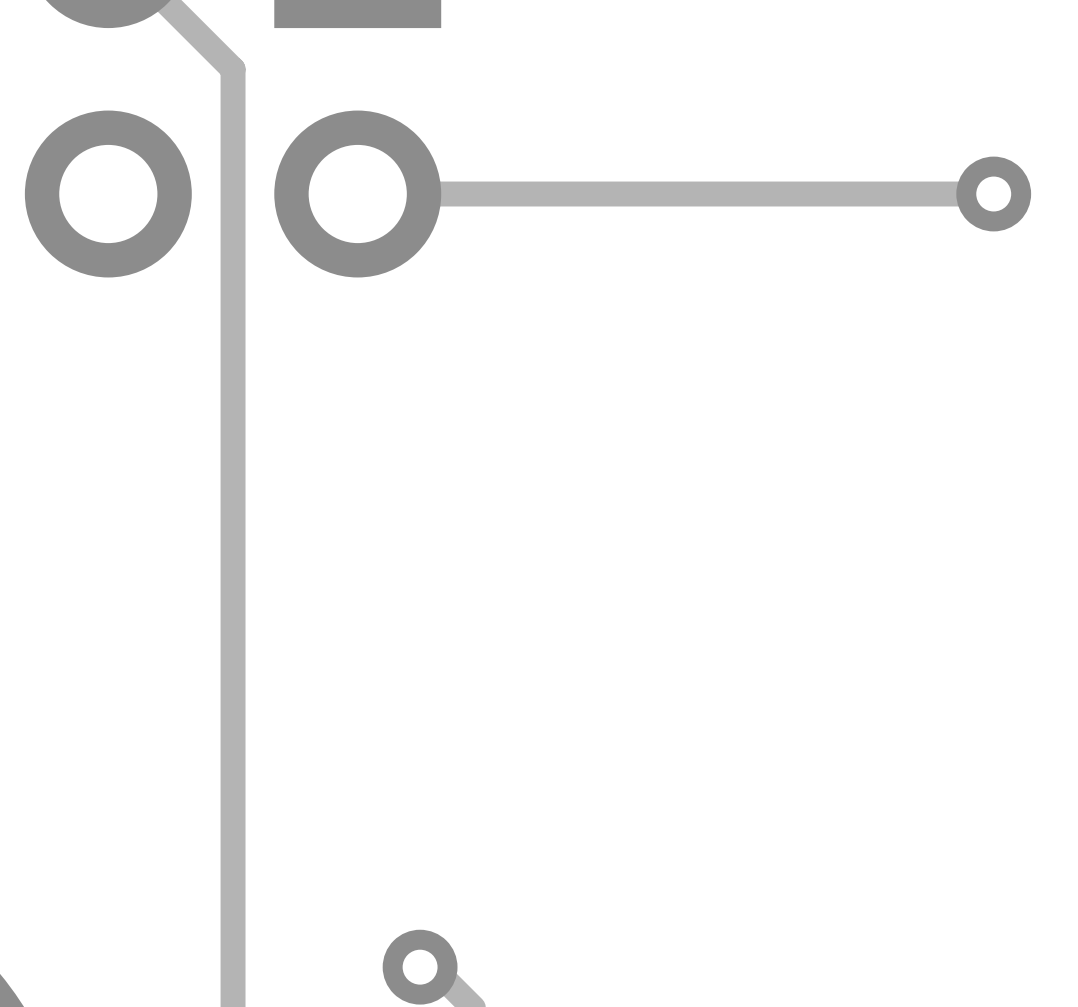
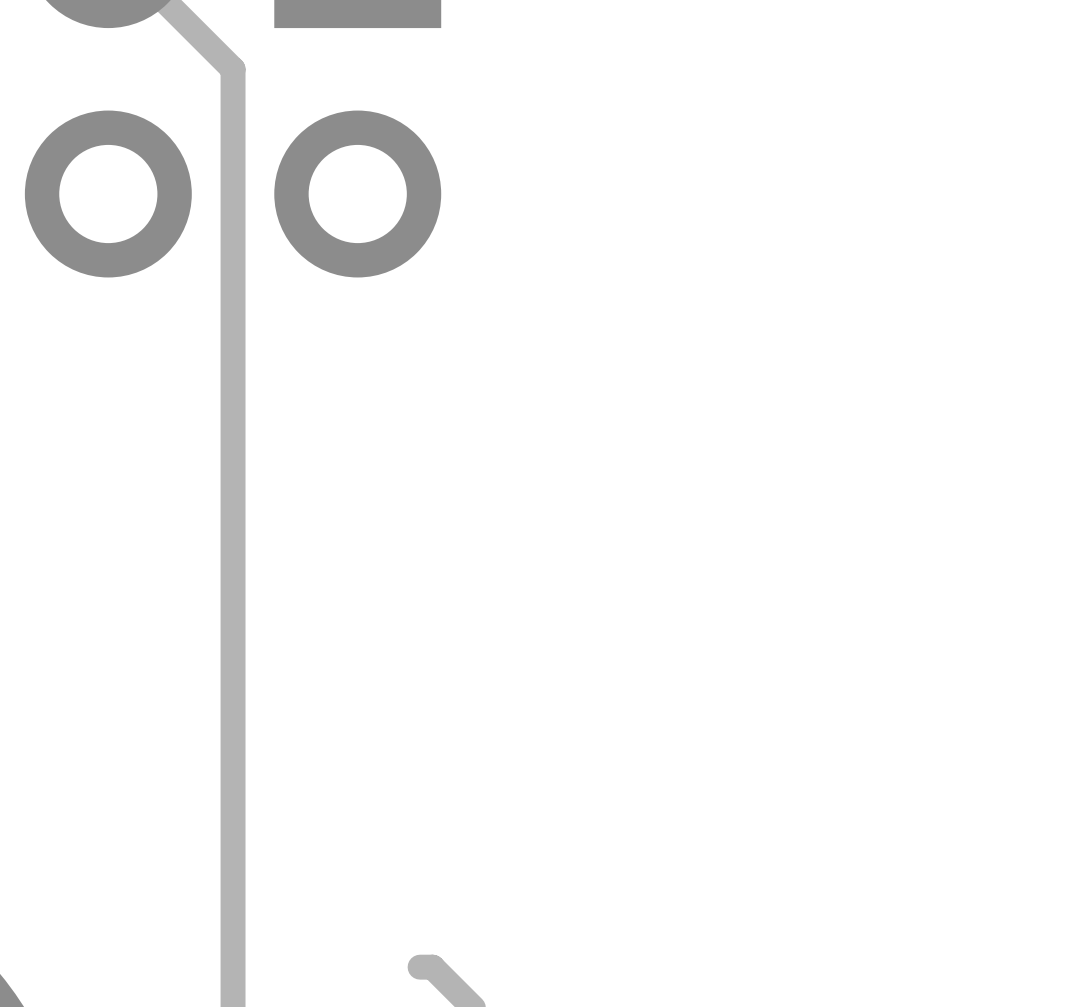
track: (993, 194) (357, 194) -> none
via: (993, 194) -> none
via: (420, 967) -> none

